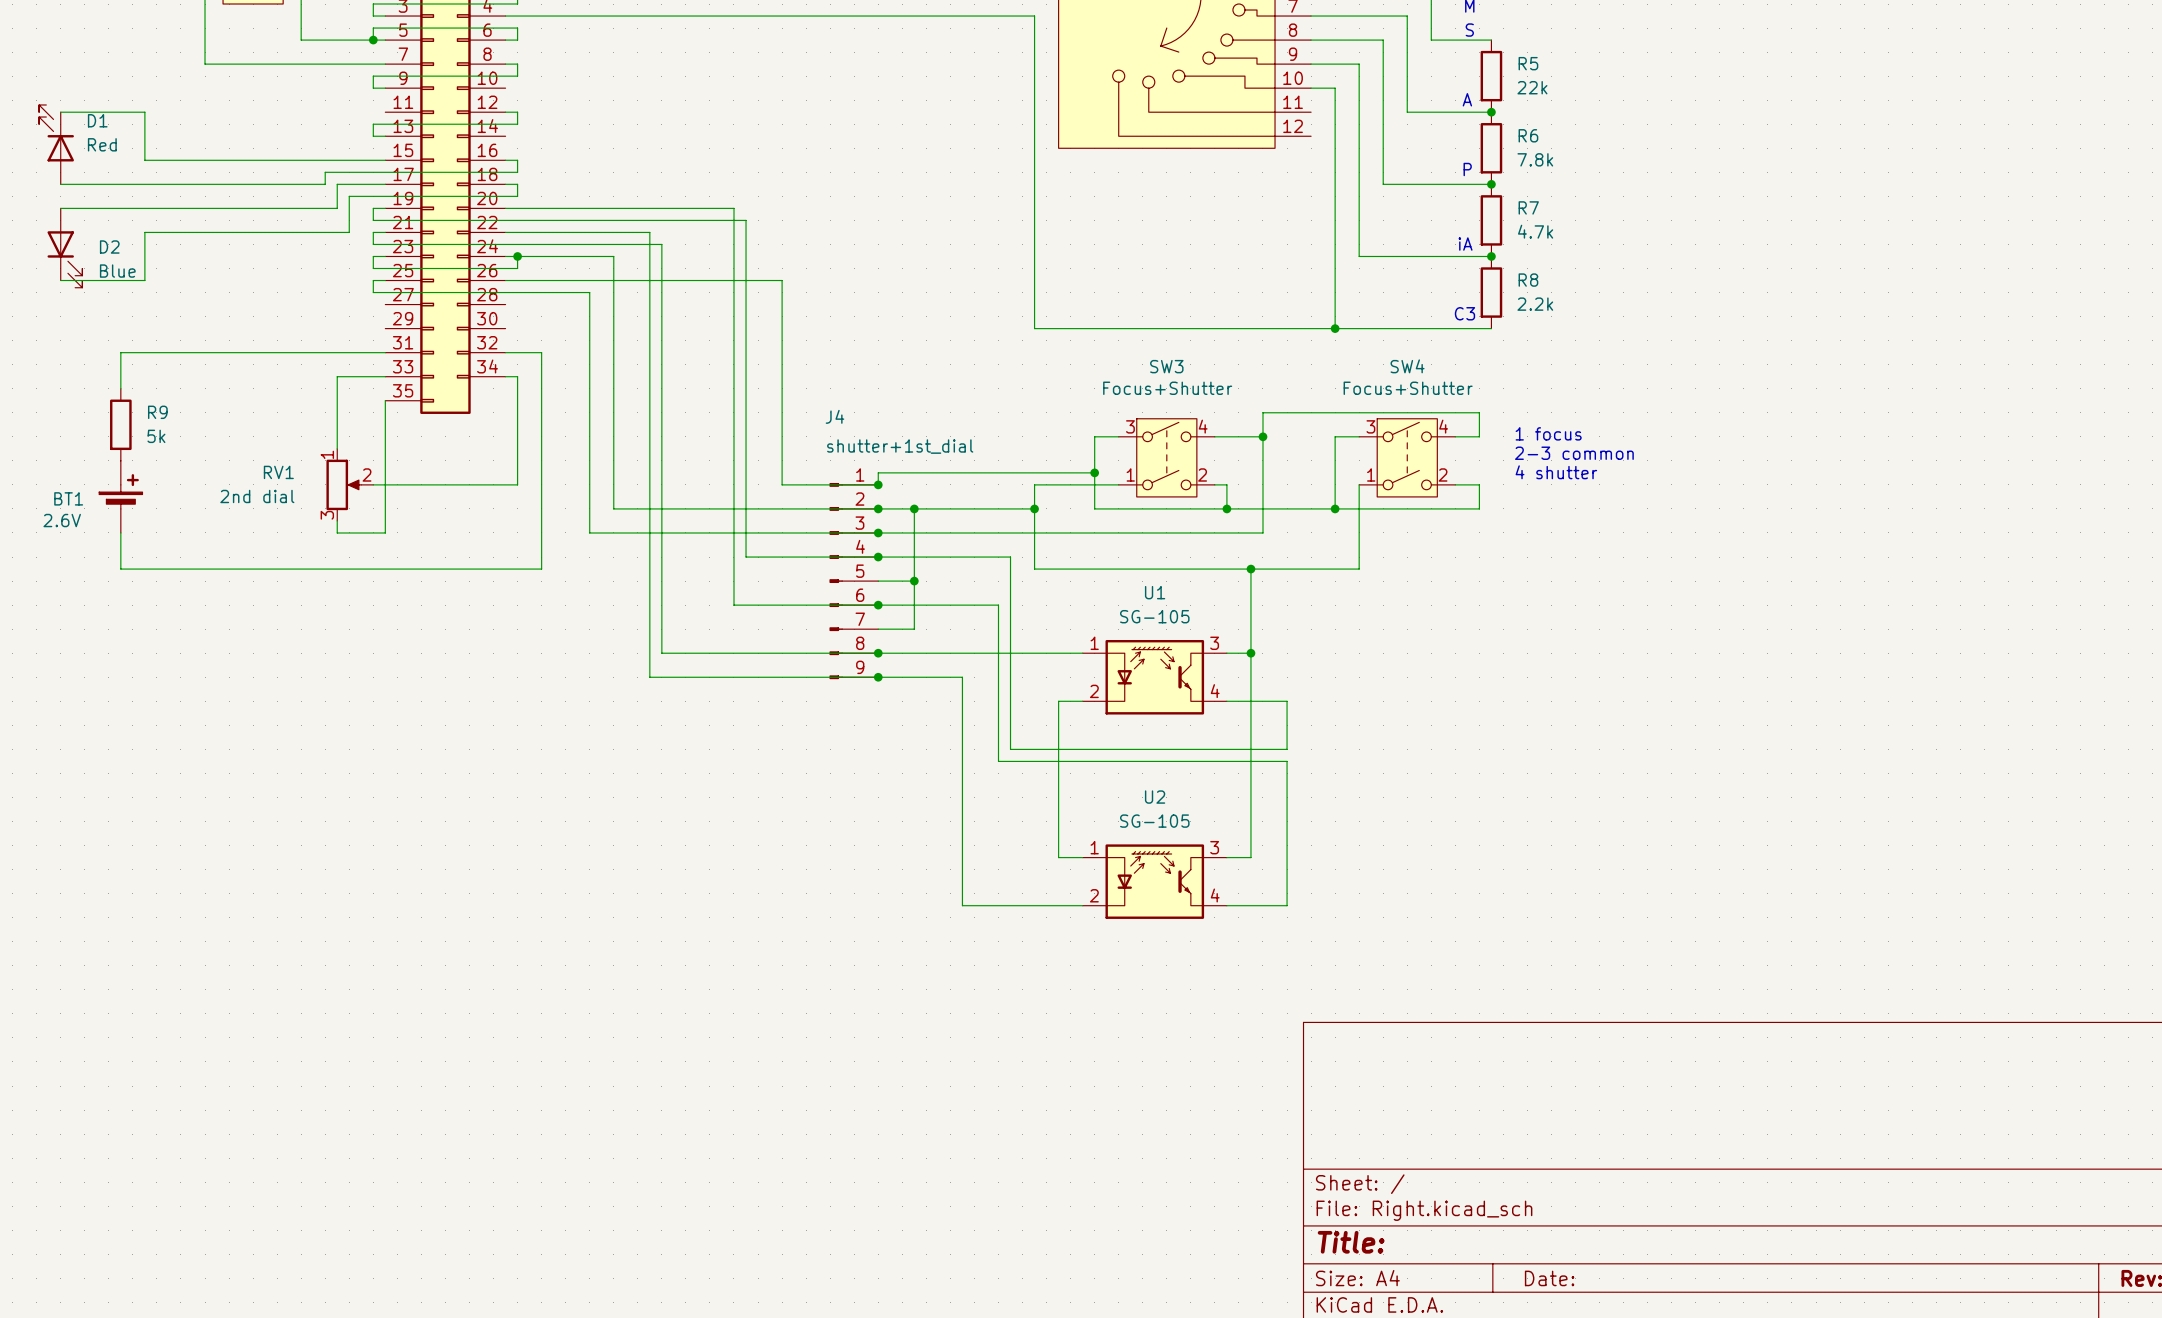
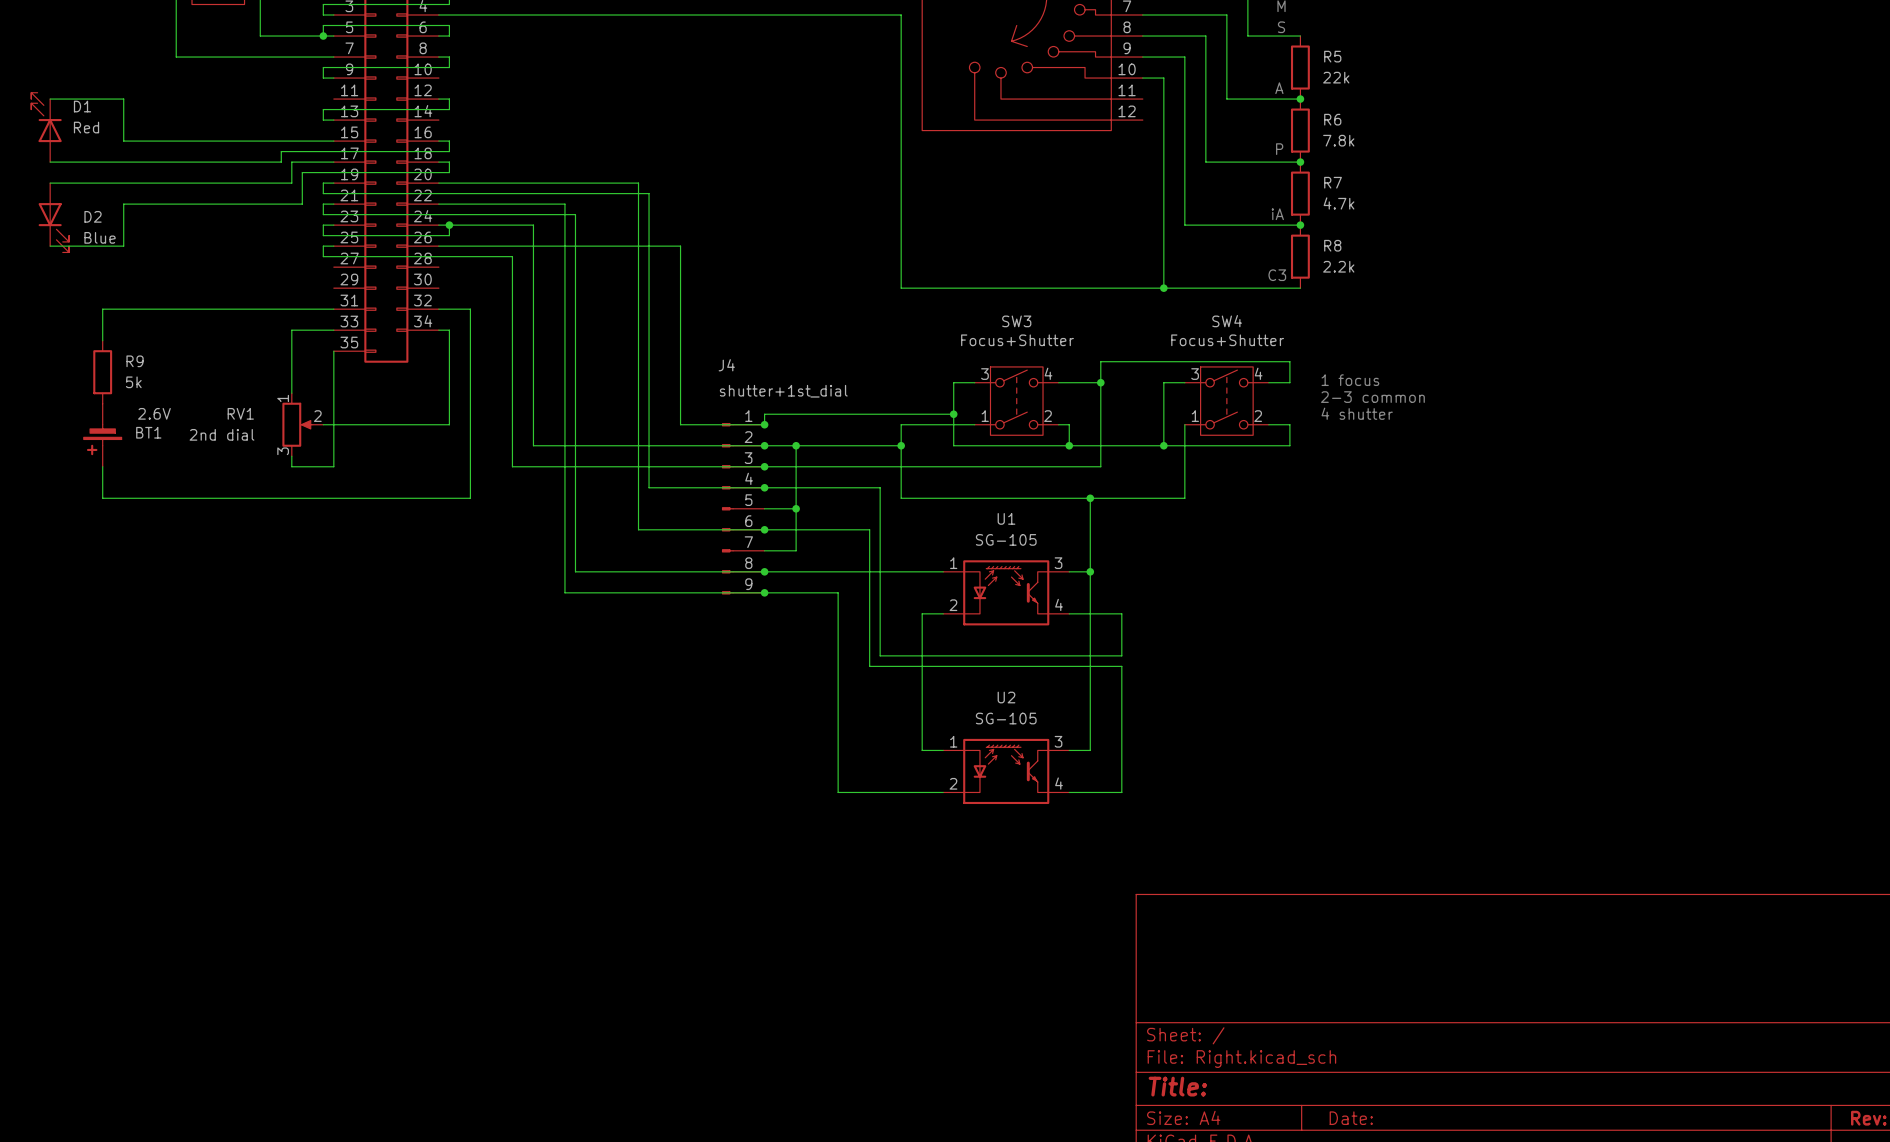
BT1 rotation: 0° (120, 491) -> 180° (102, 439)

